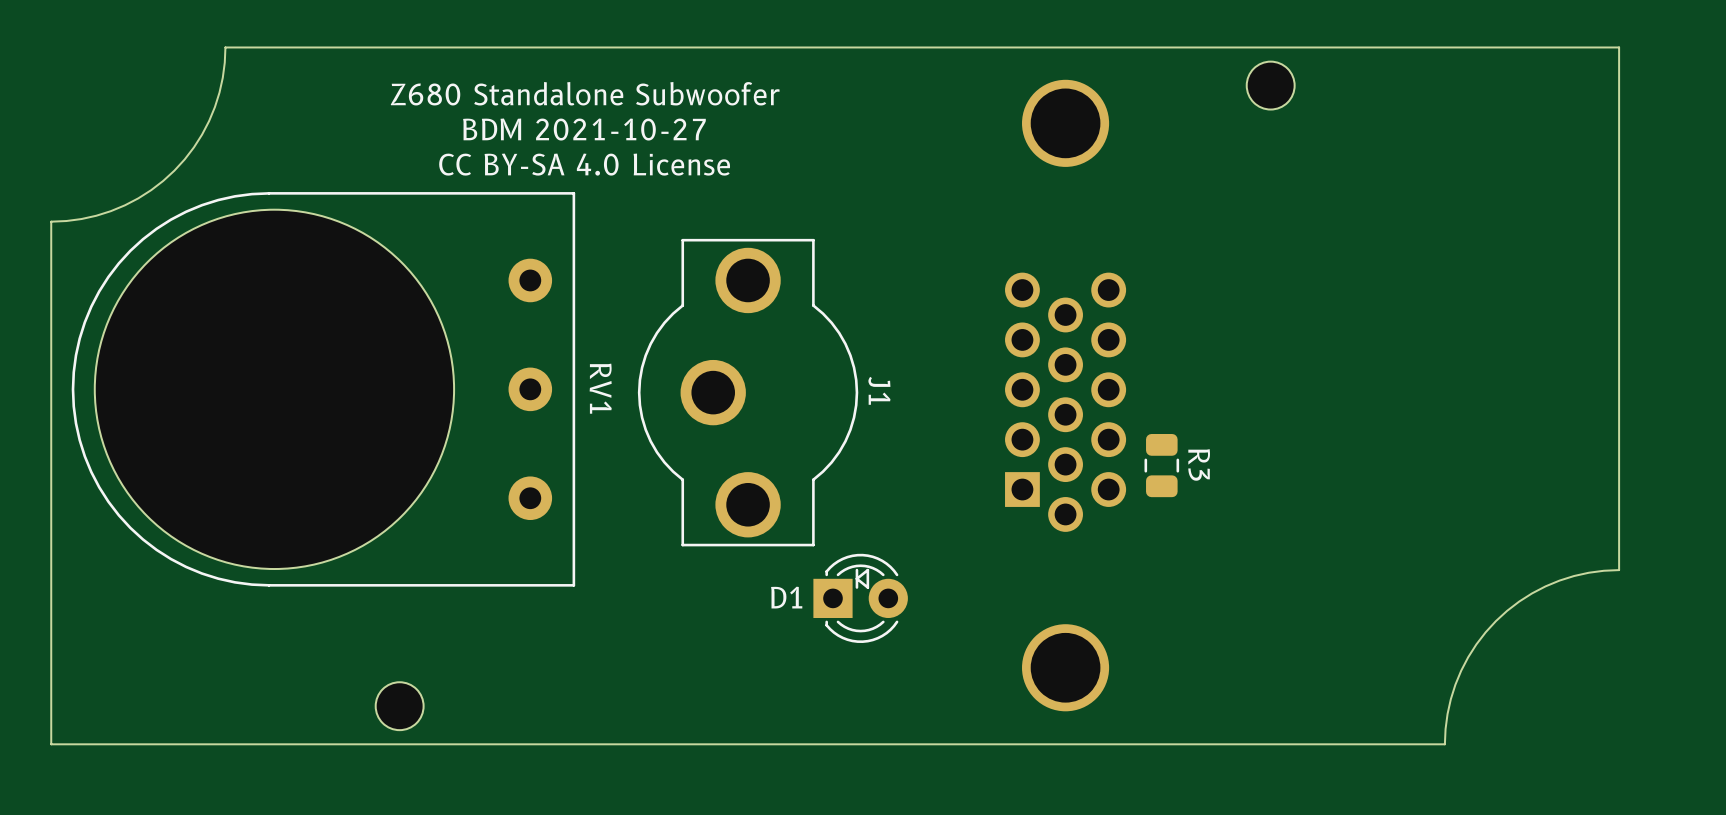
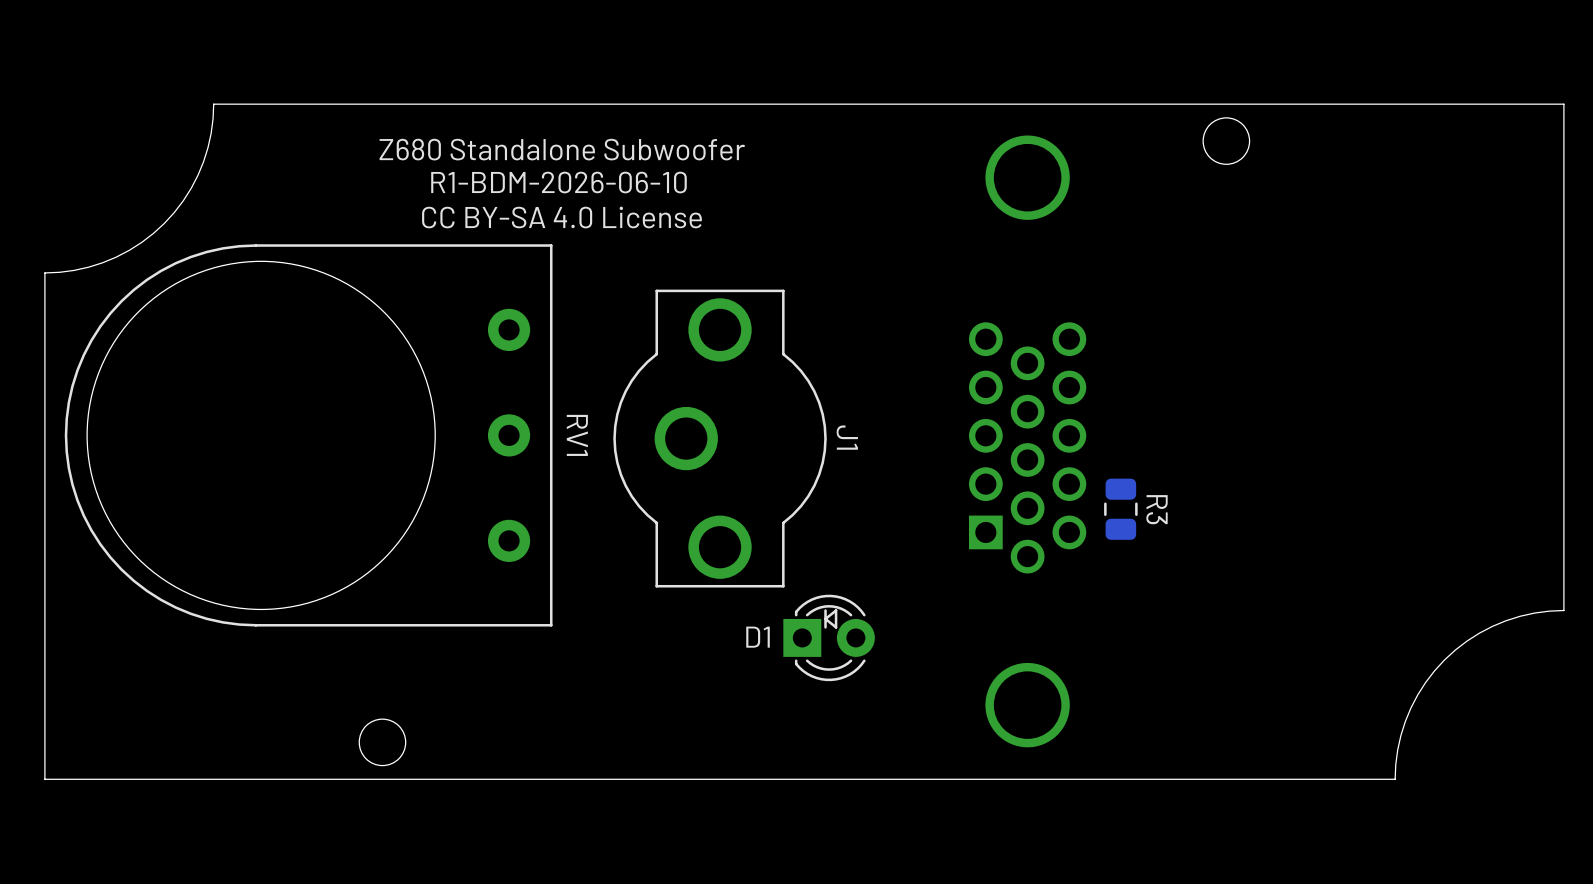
text: BDM 2021-10-27 (584, 129) -> R1-BDM-2026-06-10 (558, 182)

